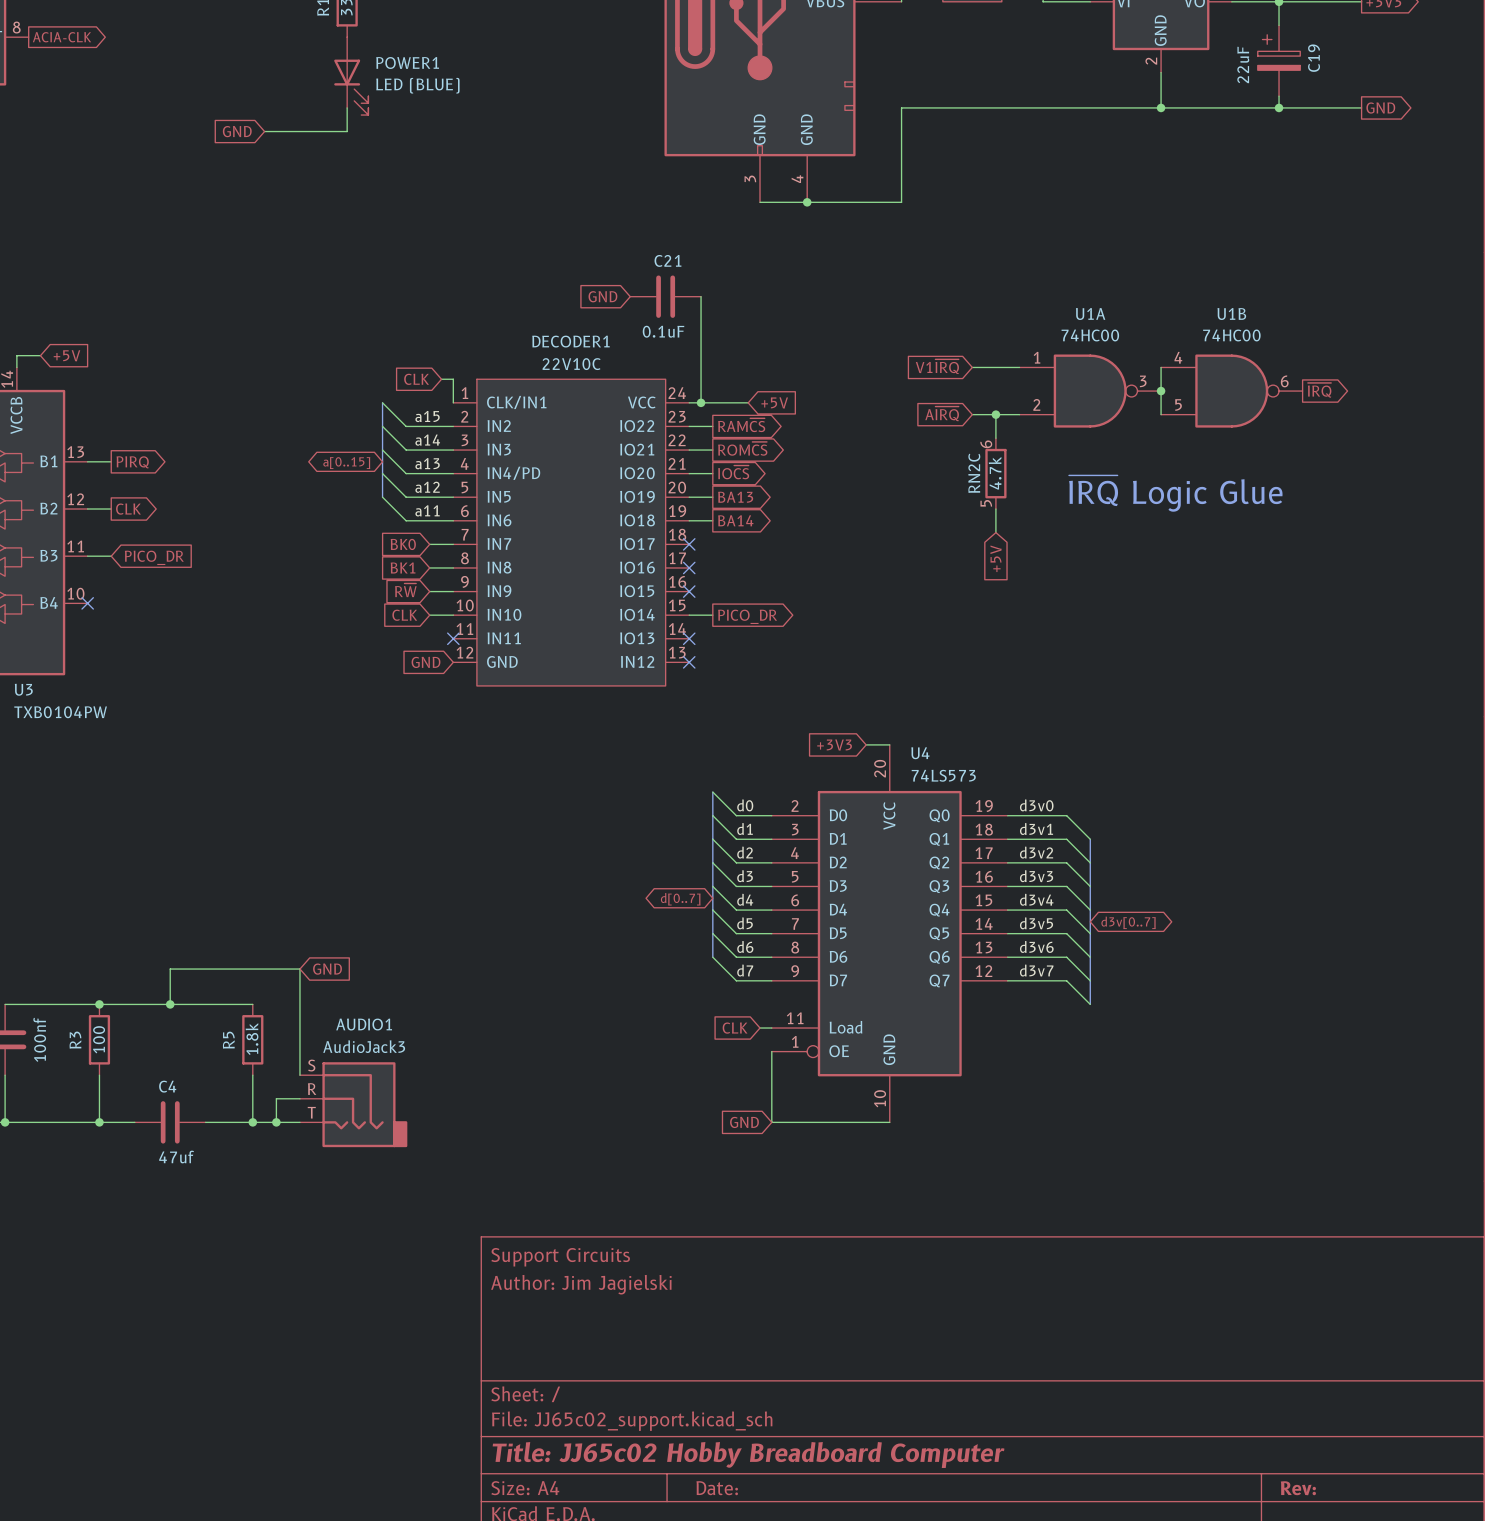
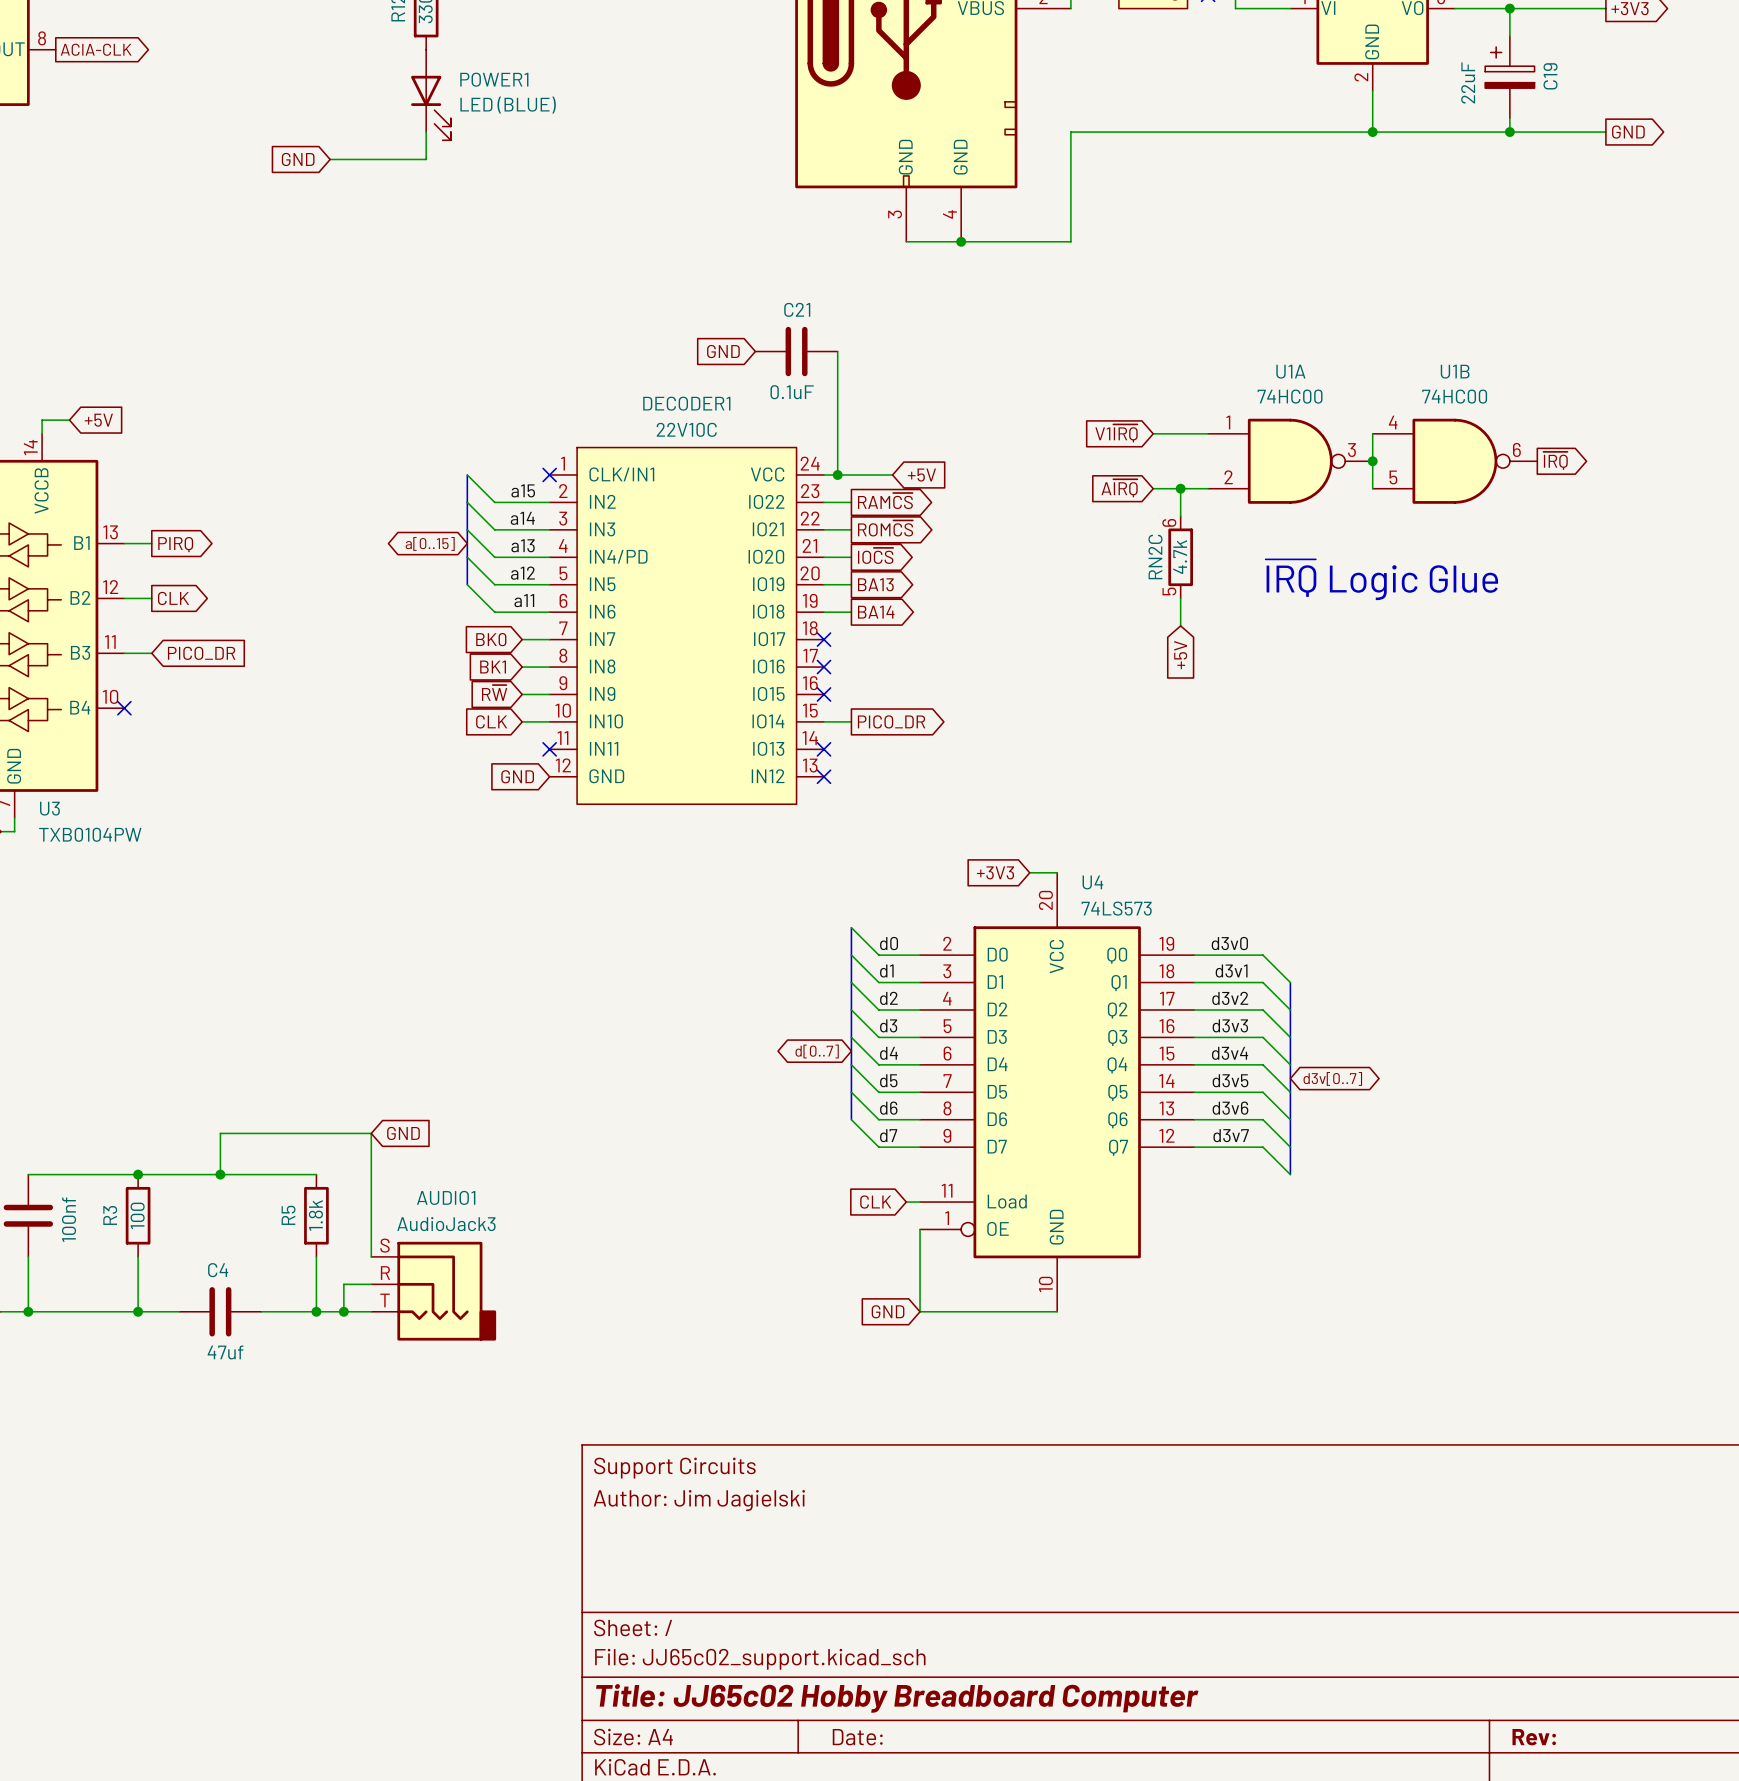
global label: CLK (416, 379) -> none
wire: (441, 379) (453, 379) (453, 402) -> none
no-connect mark: none -> (549, 474)

